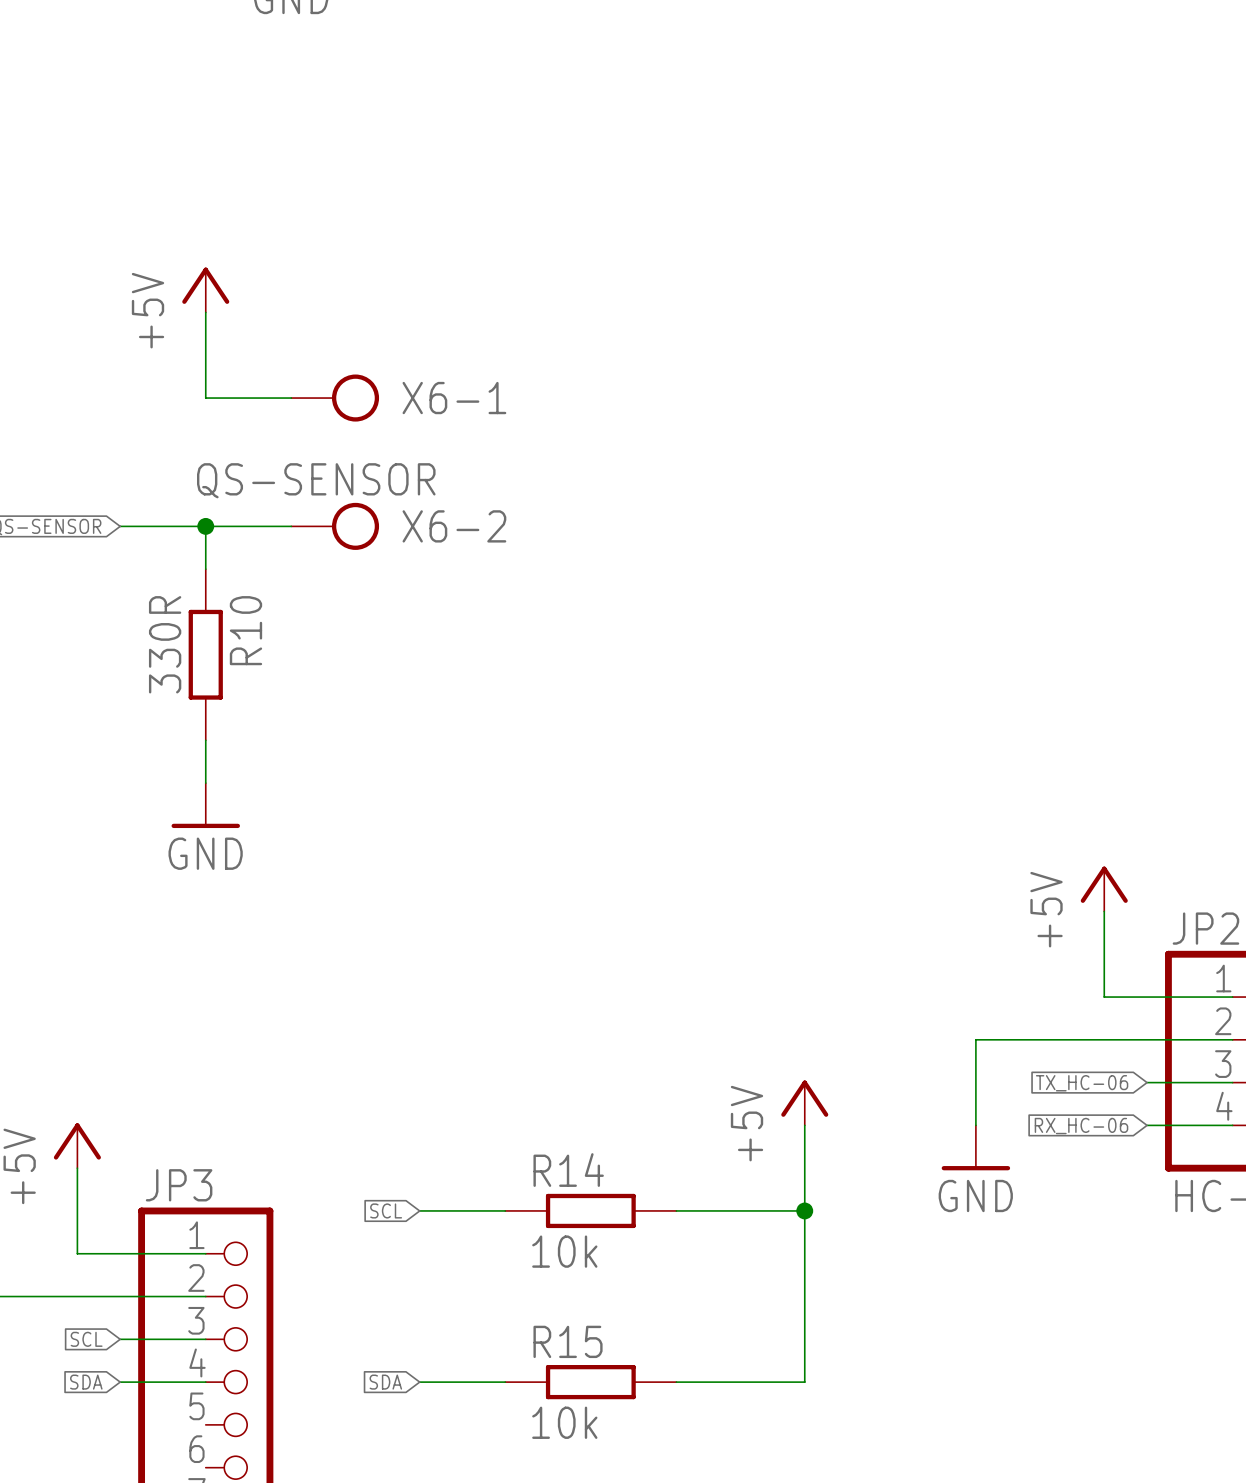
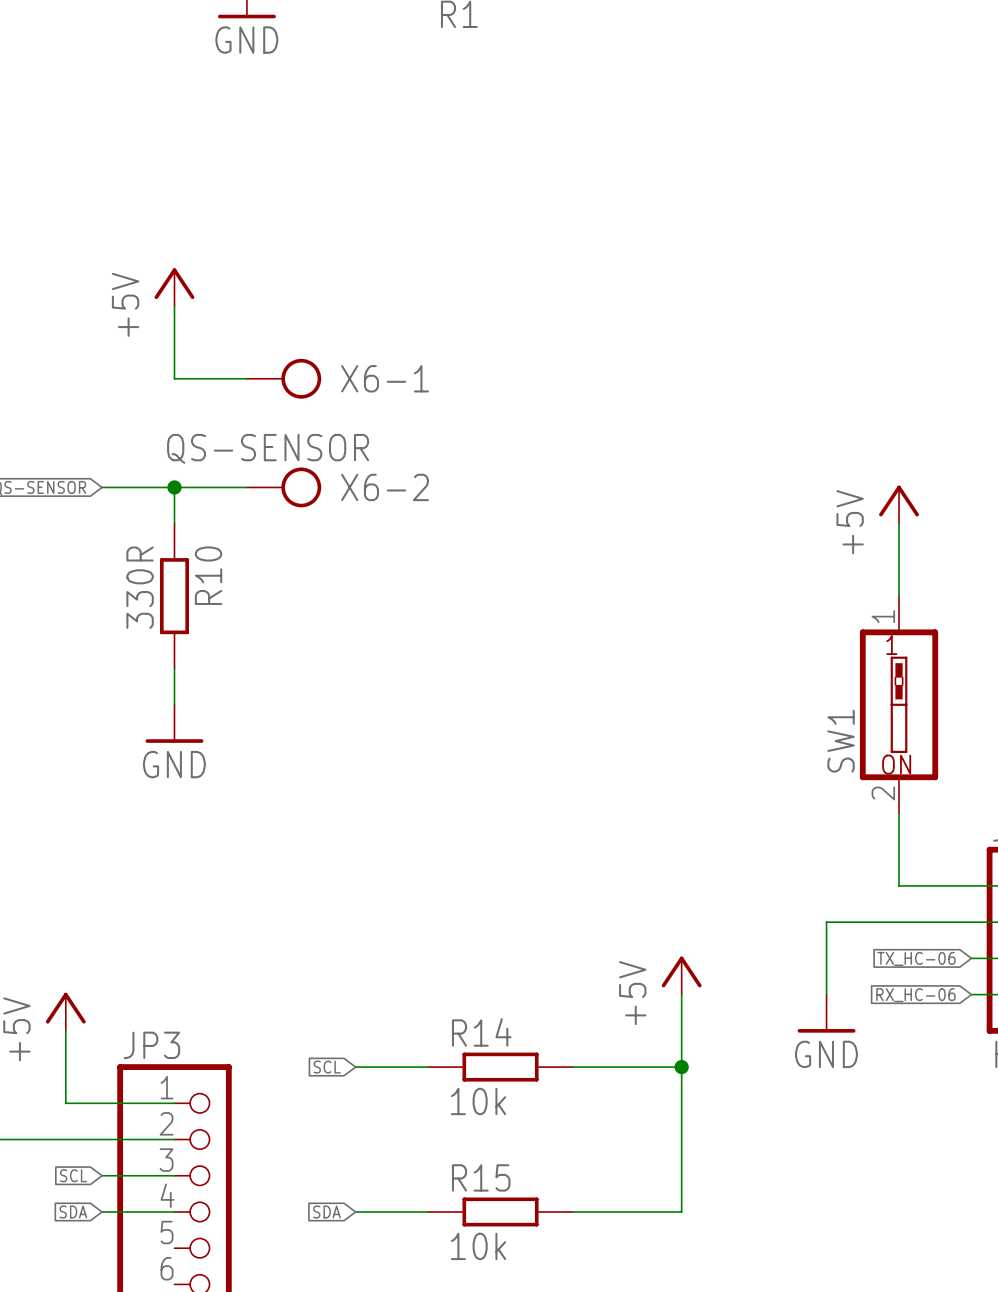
wire: none -> (899, 523) (899, 596)
SW1: none -> (899, 704)
power symbol position: +5V (1104, 889) -> +5V (899, 504)
wire: (1104, 911) (1104, 997) -> (899, 813) (899, 885) (935, 885)

